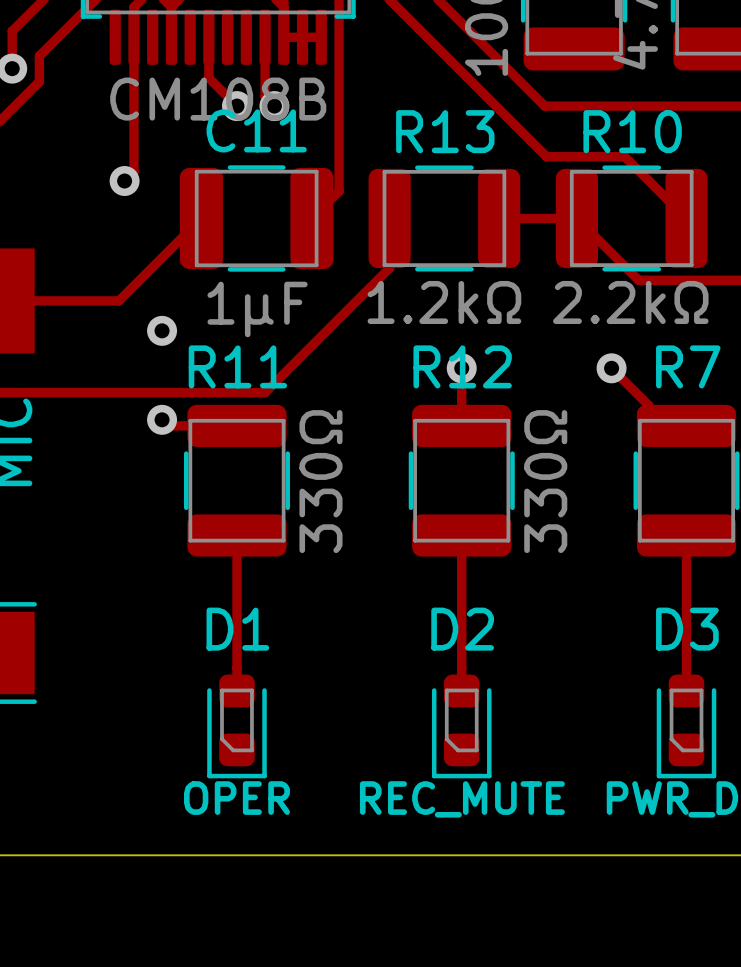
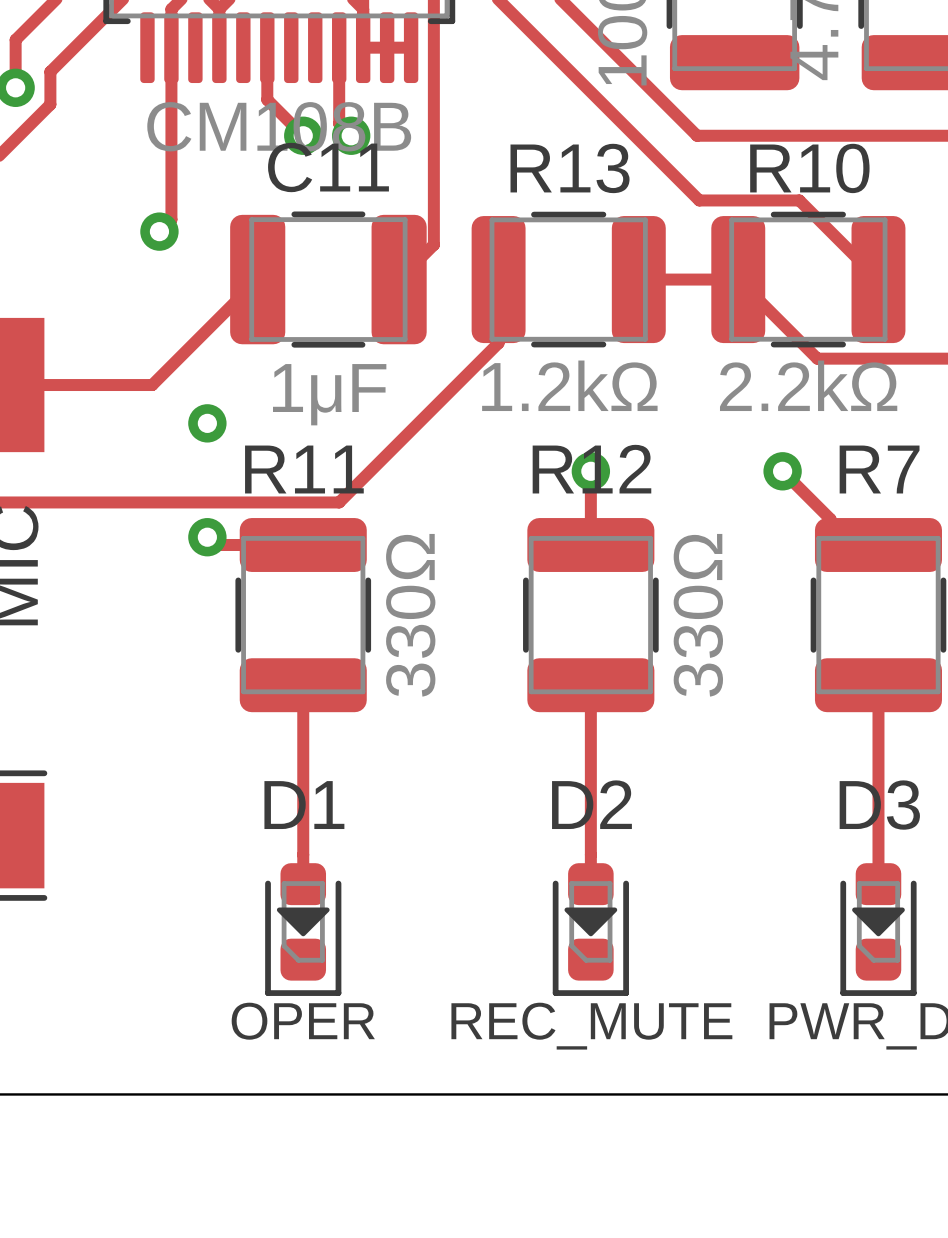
D1 footprint: [207, 674, 267, 779] -> [265, 863, 342, 996]
D2 footprint: [431, 674, 492, 779] -> [552, 863, 629, 996]
D3 footprint: [656, 674, 717, 779] -> [840, 863, 917, 996]

